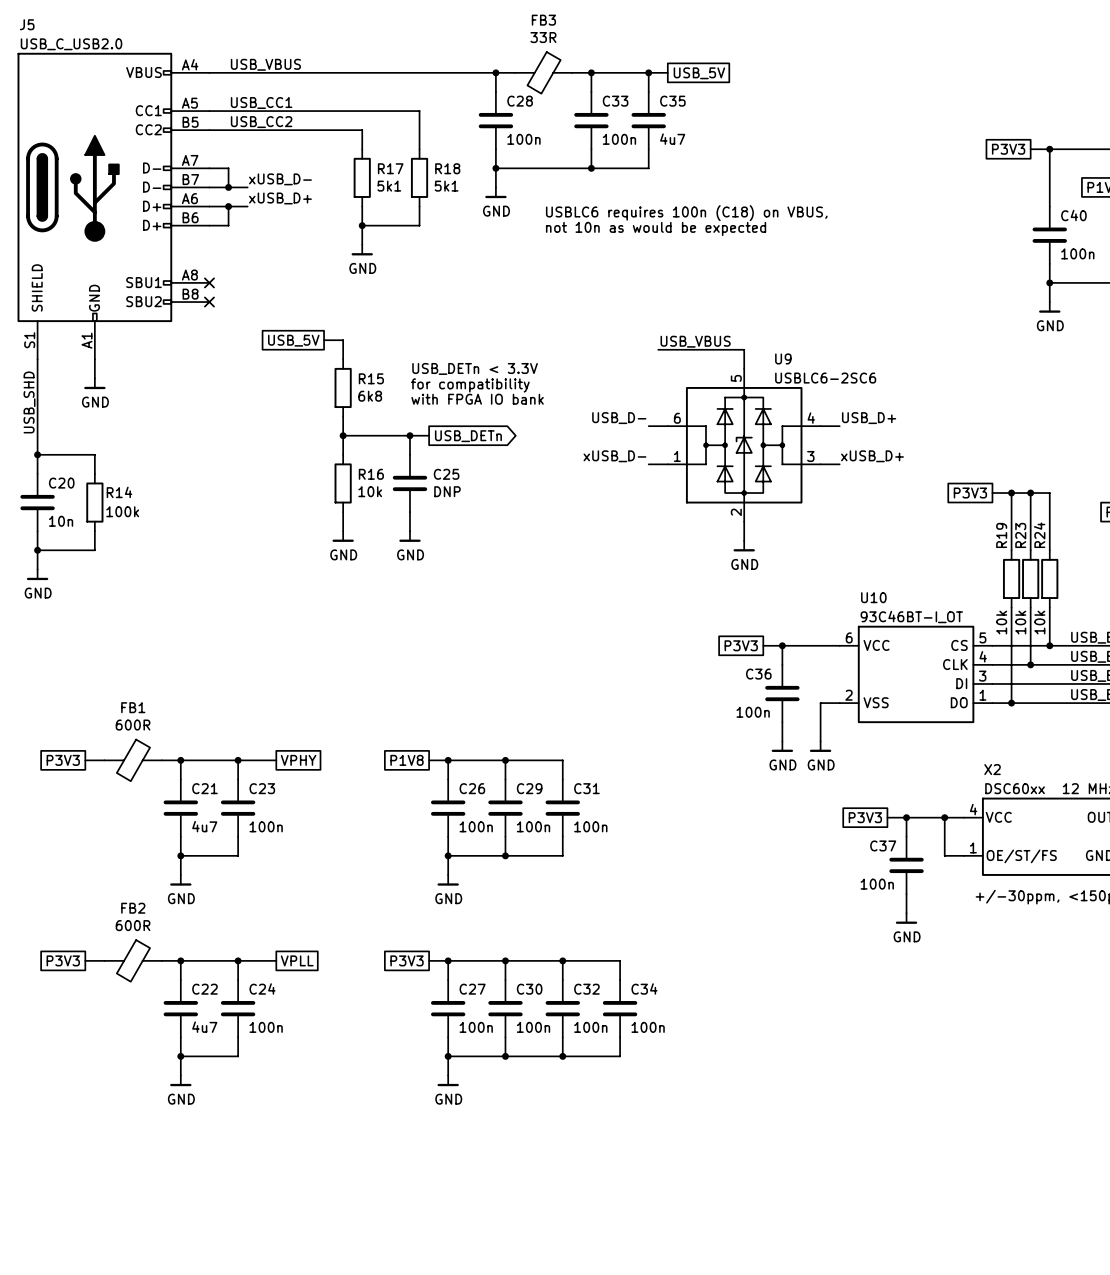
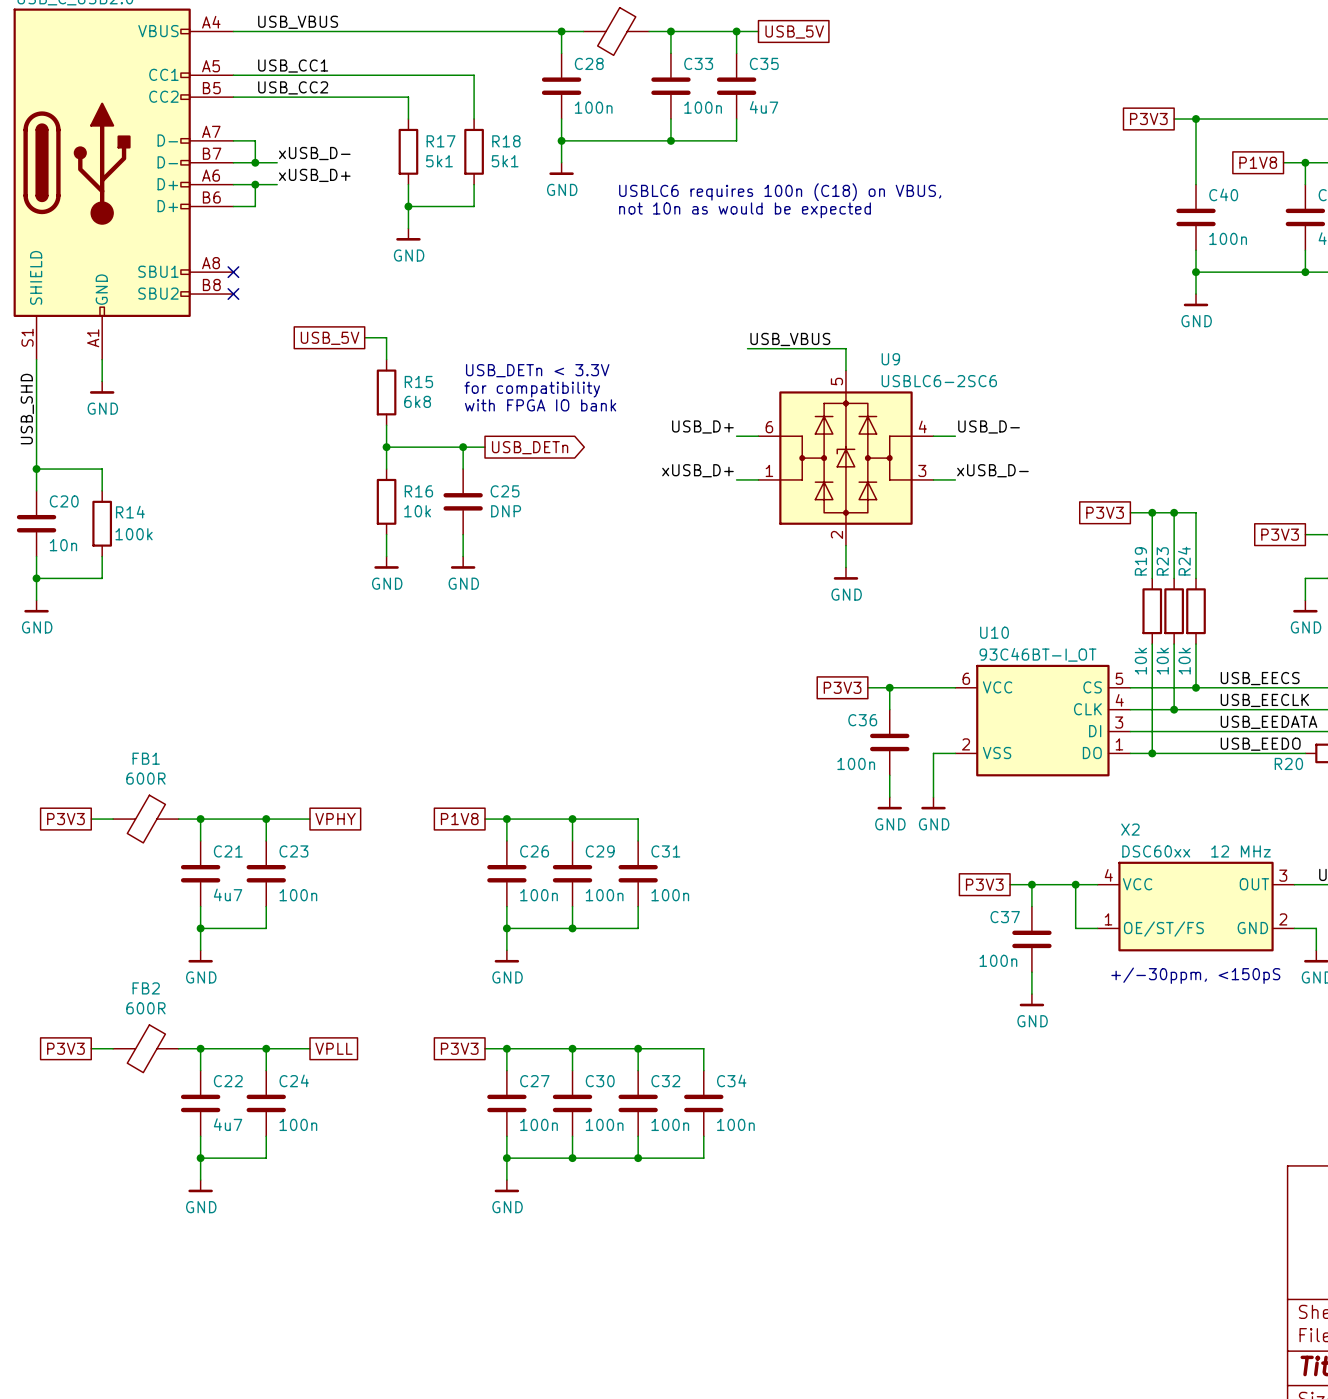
label: USB_D- (619, 418) -> USB_D+ (702, 426)
label: USB_D+ (869, 418) -> USB_D- (989, 426)
label: xUSB_D- (614, 456) -> xUSB_D+ (697, 470)
label: xUSB_D+ (872, 456) -> xUSB_D- (992, 470)

